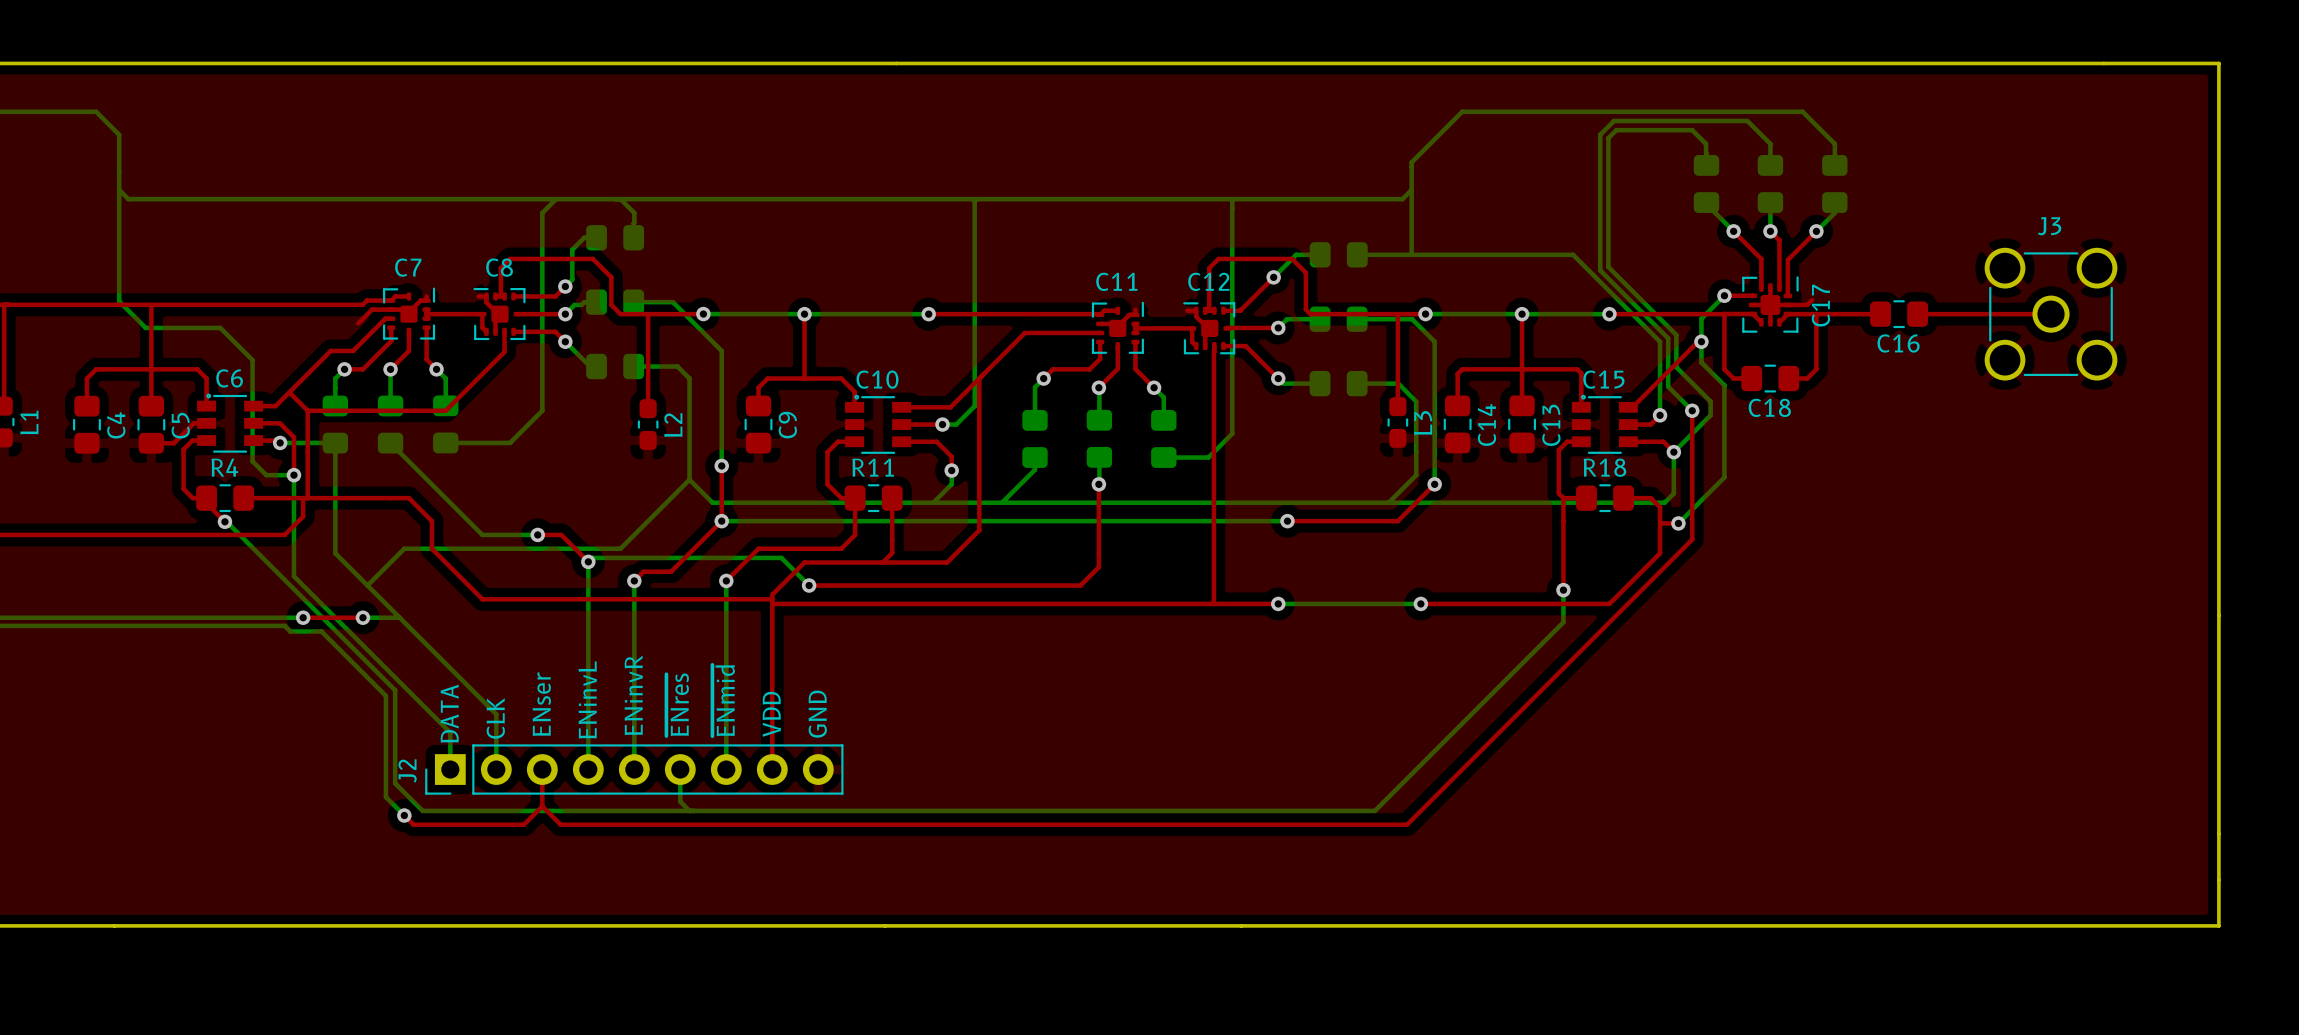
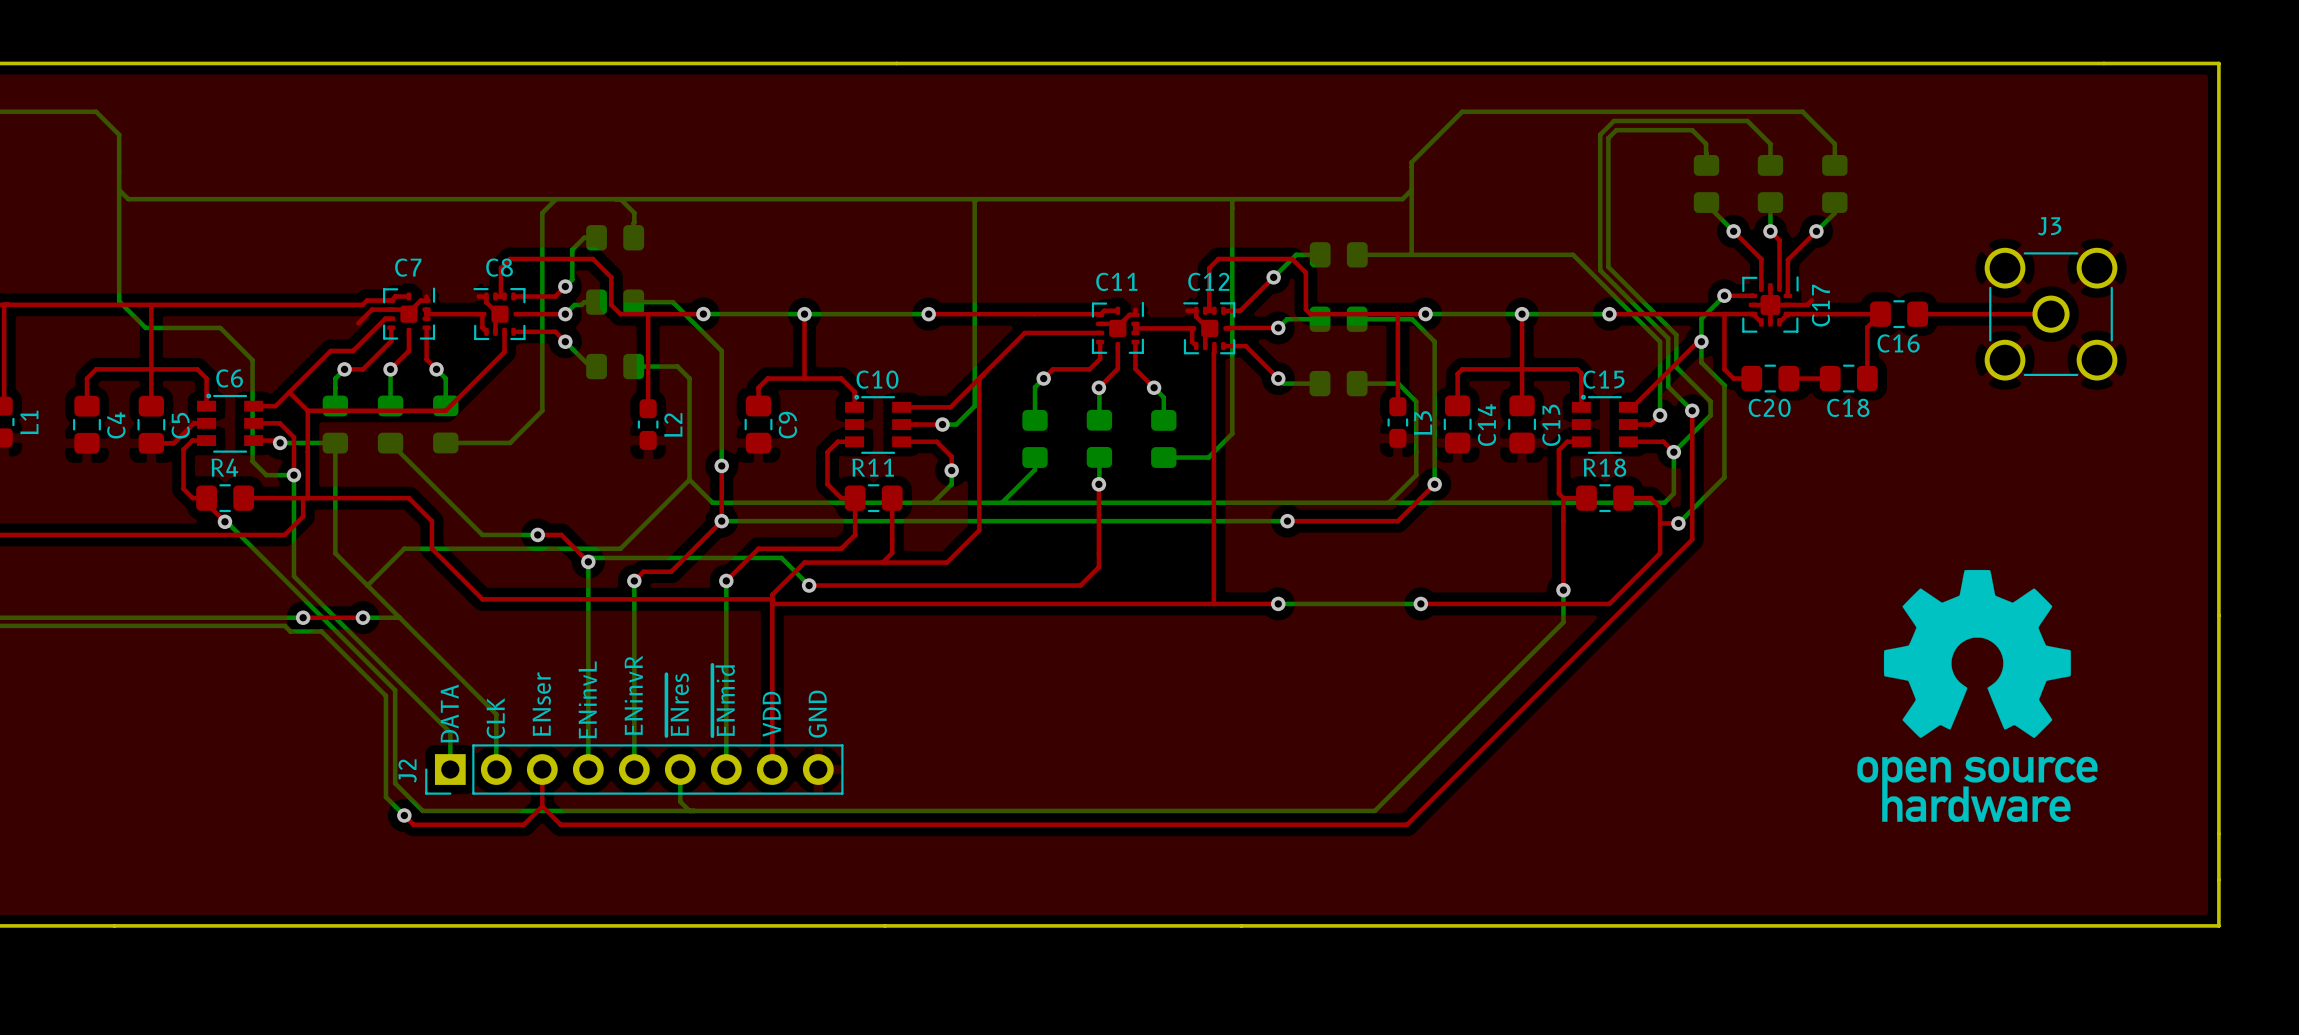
top track: (1816, 314) (1816, 369) (1807, 378) -> (1830, 378) (1807, 378)
top track: none -> (1880, 314) (1867, 327) (1867, 378)
C18: none -> (1848, 378)
C18 name: C18 (1769, 407) -> C20 (1769, 407)
drawing: none -> [1857, 569, 2098, 823]

